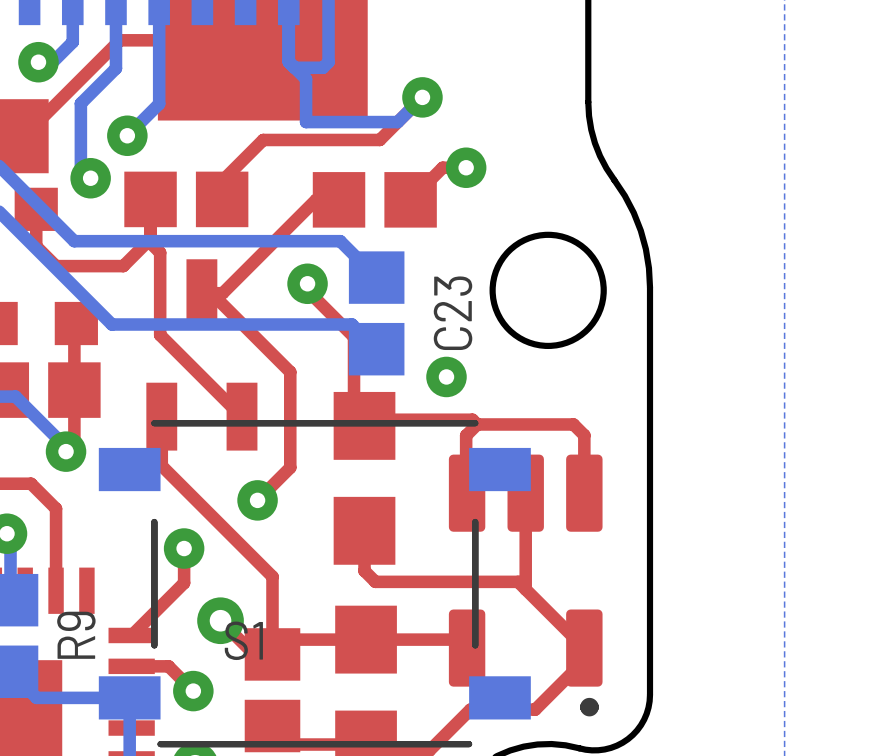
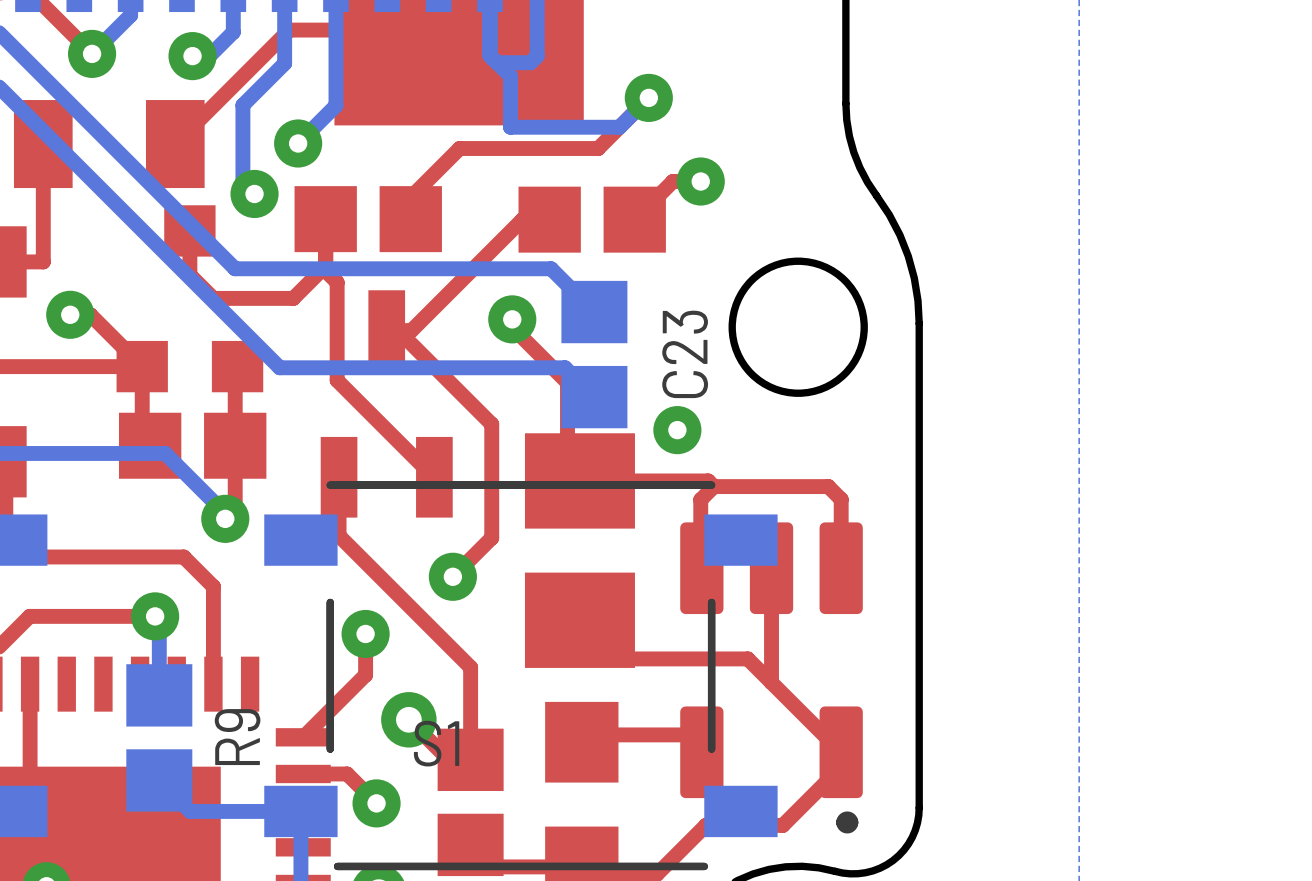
part footprint: [333, 391, 396, 565] -> [524, 433, 635, 668]
top track: (364, 530) (364, 570) (375, 581) (518, 581) -> (580, 620) (619, 658) (747, 658) (762, 673)
top track: (272, 637) (272, 654) (287, 639) (458, 639) -> (581, 734) (684, 734) (691, 742)

